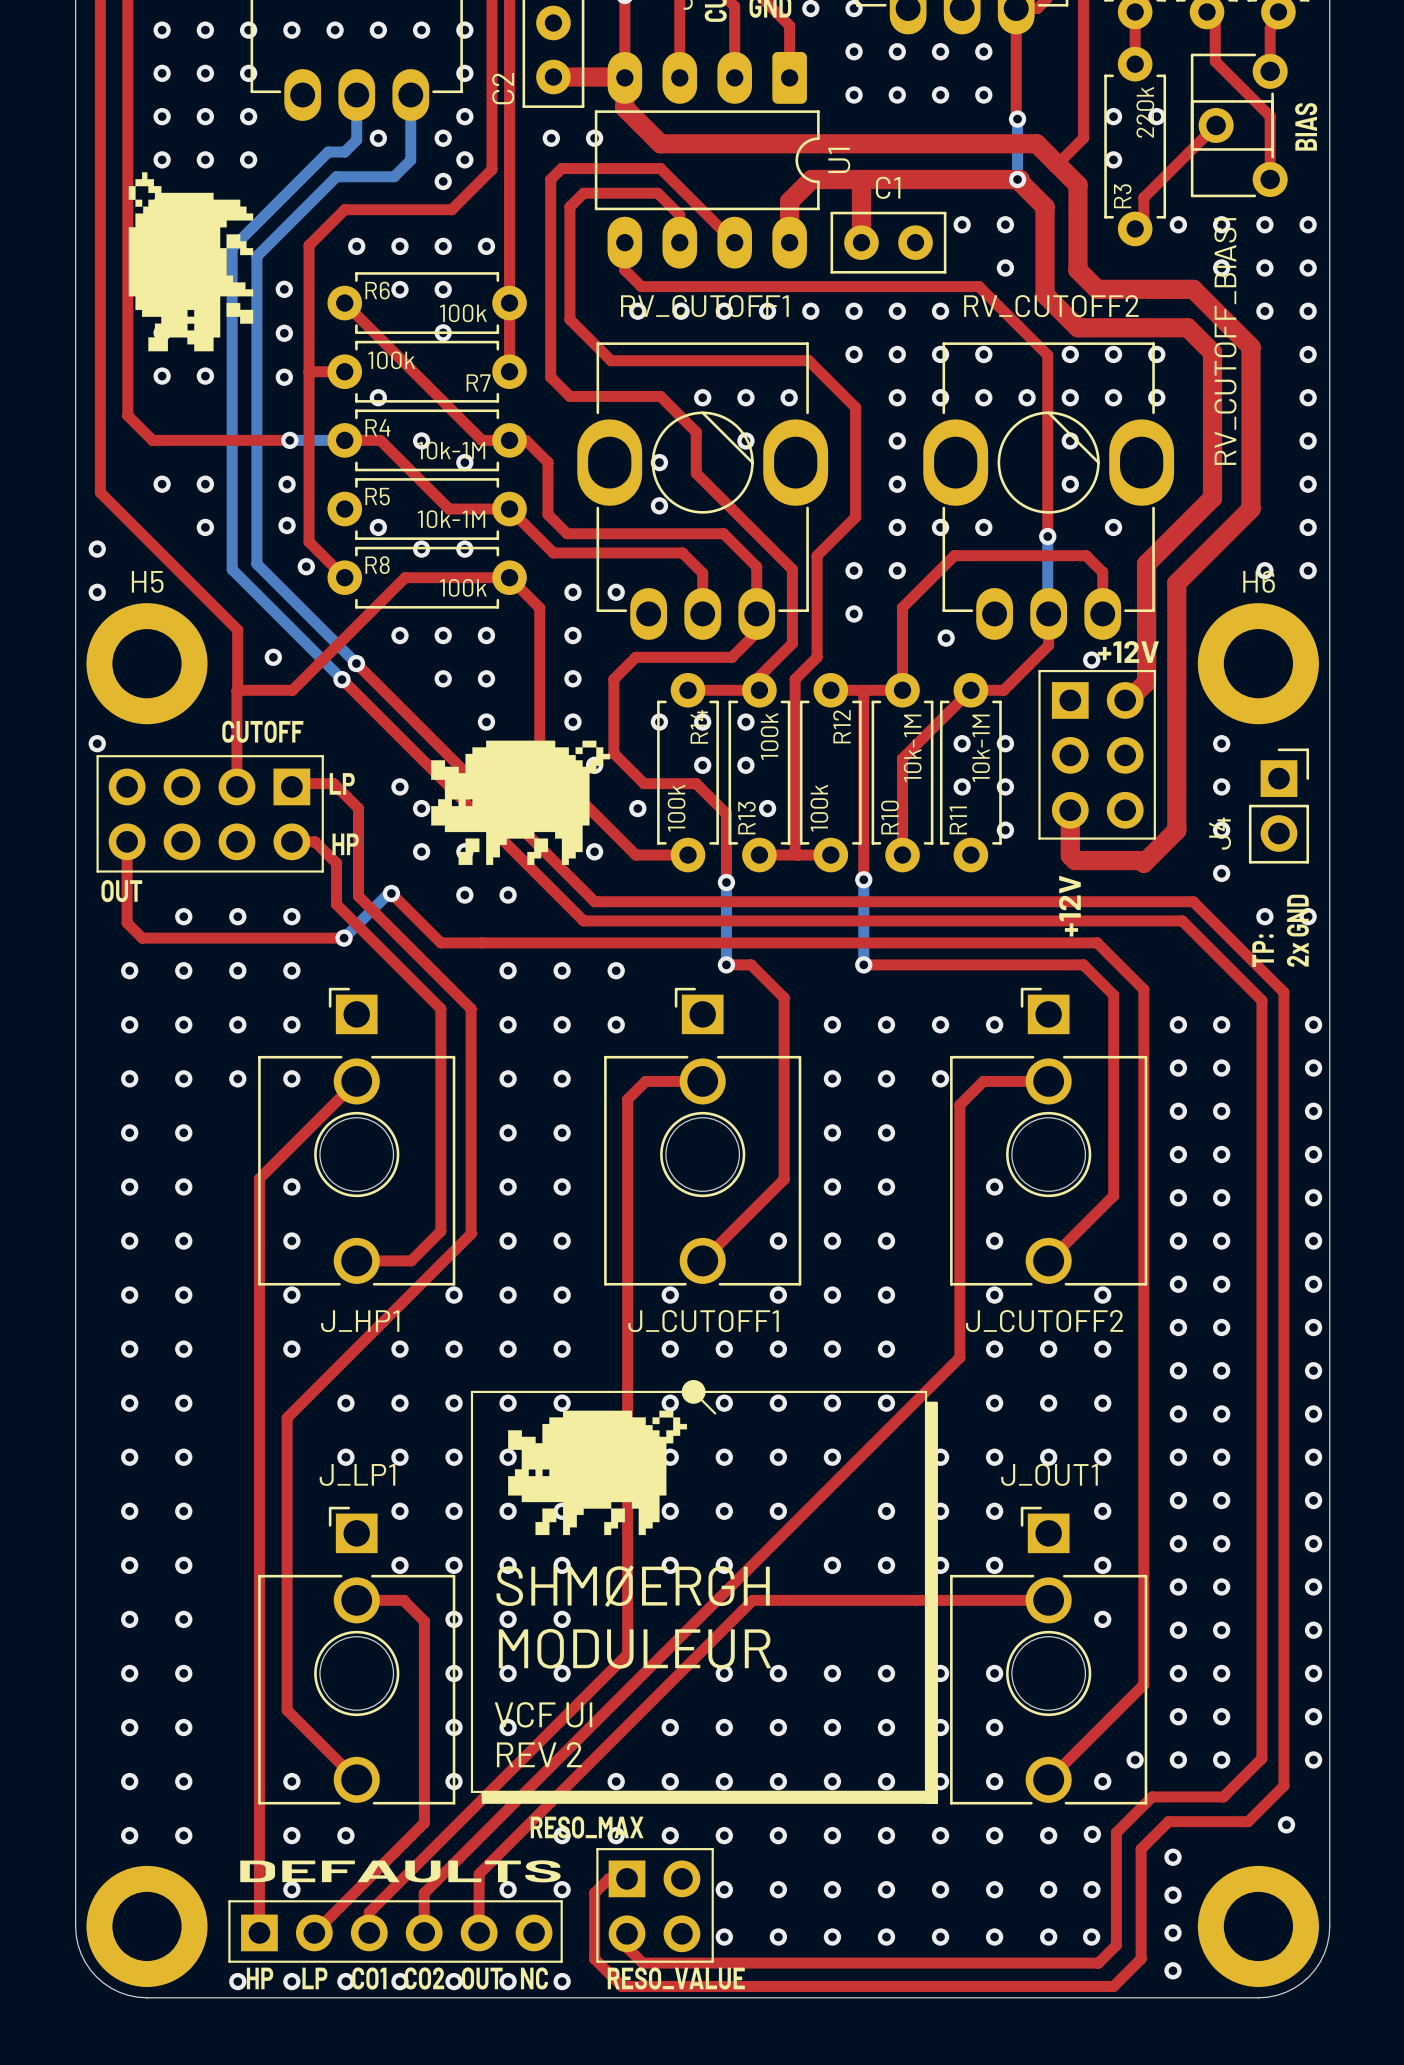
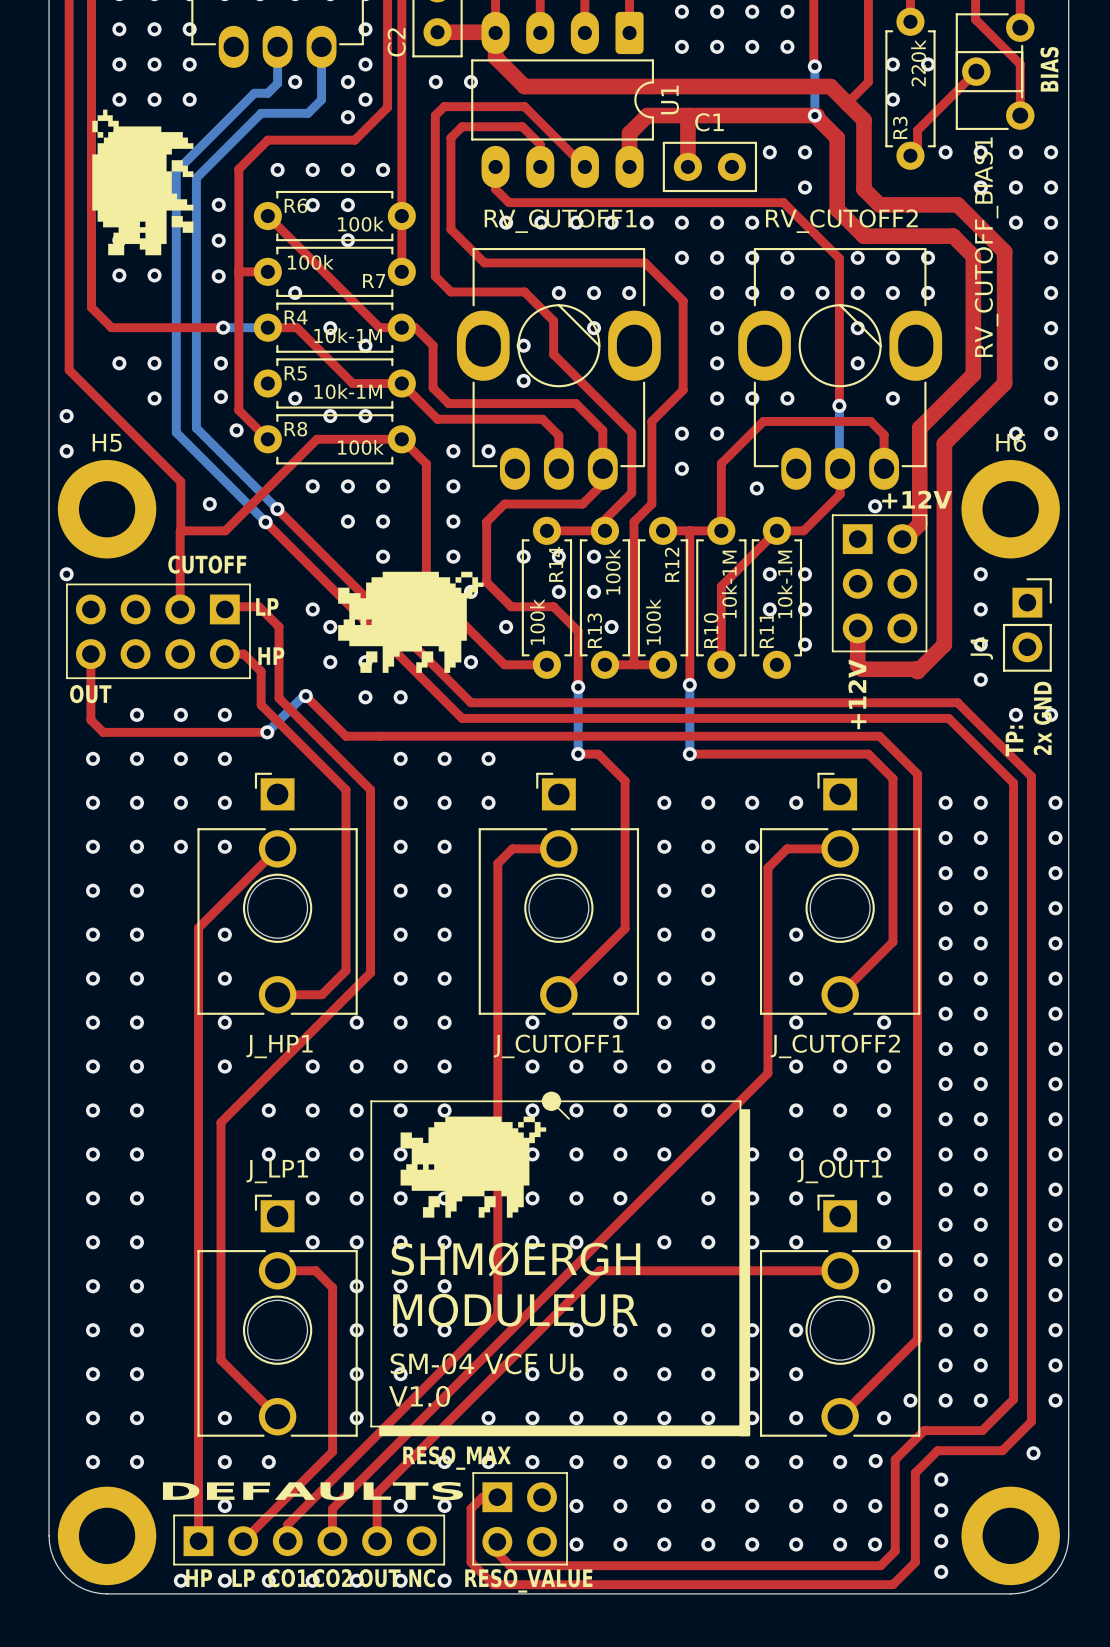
text: VCF UI (543, 1714) -> SM-04 VCF UI (482, 1363)
text: REV 2 (539, 1754) -> V1.0 (419, 1396)

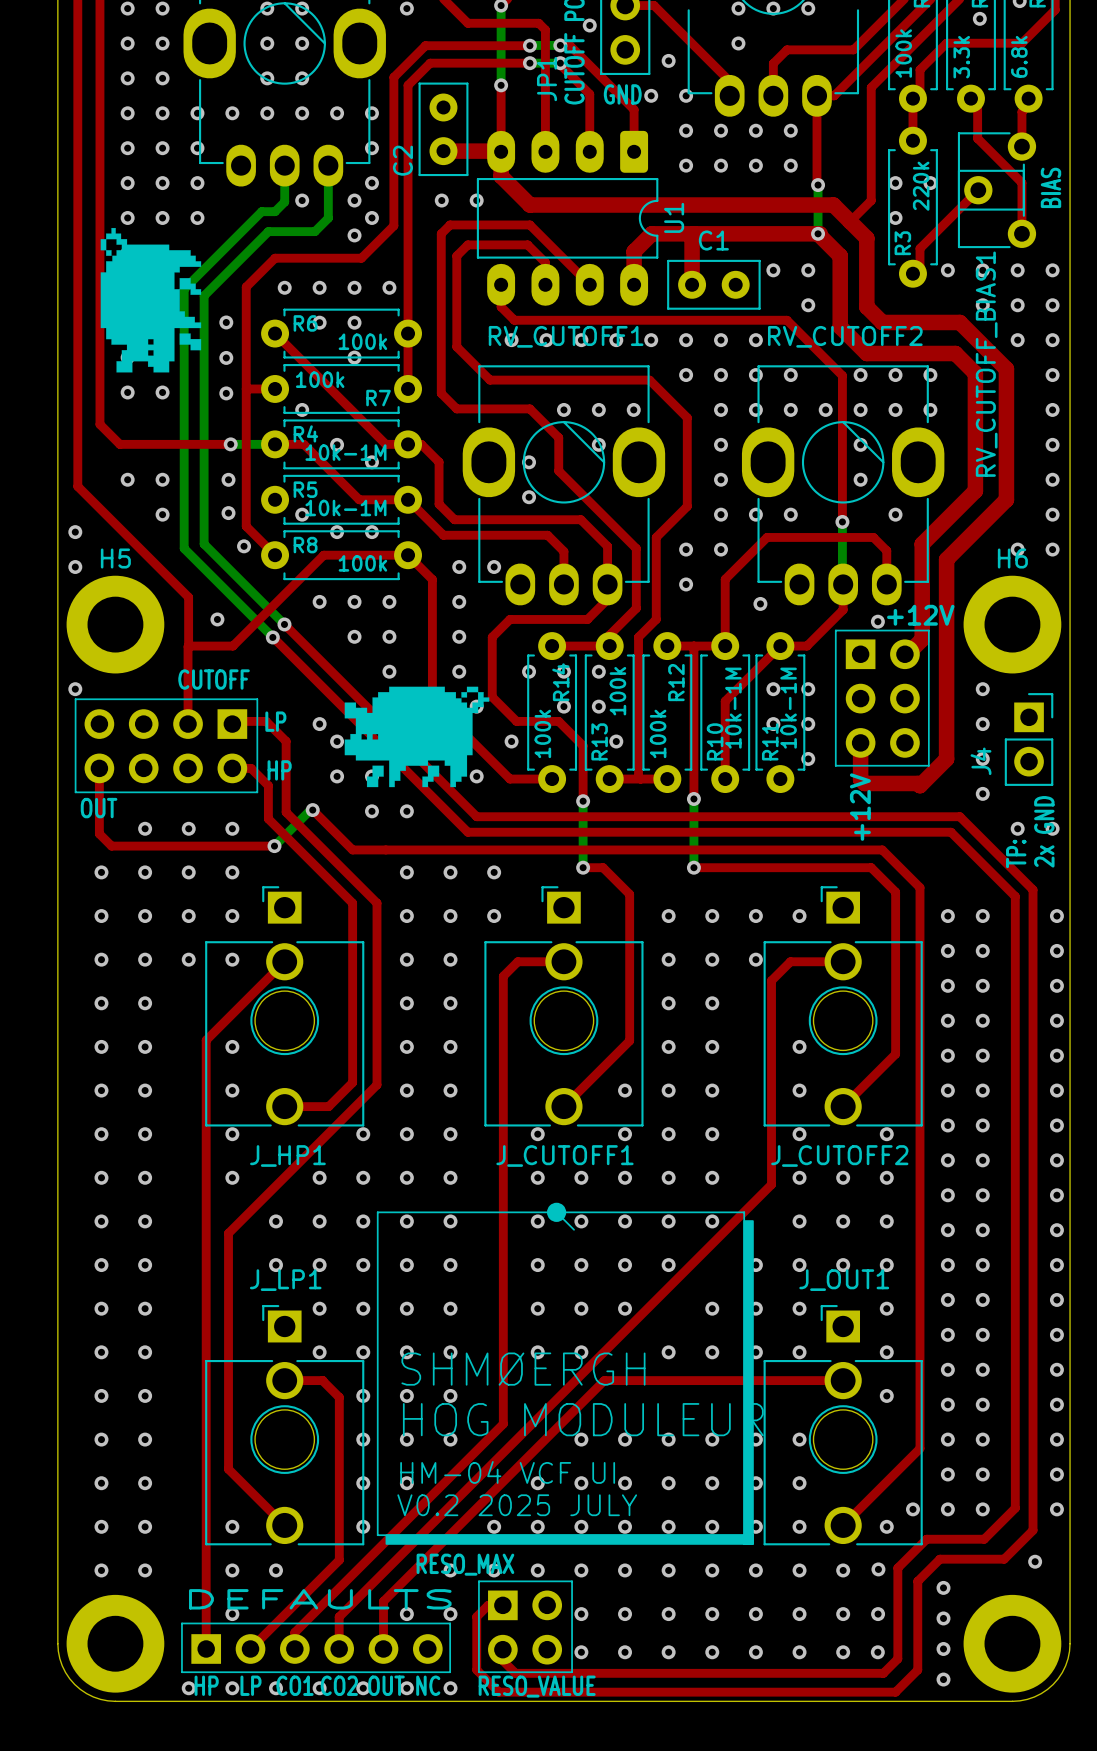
drawing: [400, 1116, 547, 1218] -> none
text: MODULEUR (515, 1310) -> HOG MODULEUR (583, 1419)
text: SM-04 VCF UI (482, 1363) -> HM-04 VCF UI (507, 1472)
text: V1.0 (419, 1396) -> V0.2 2025 JULY (517, 1505)

